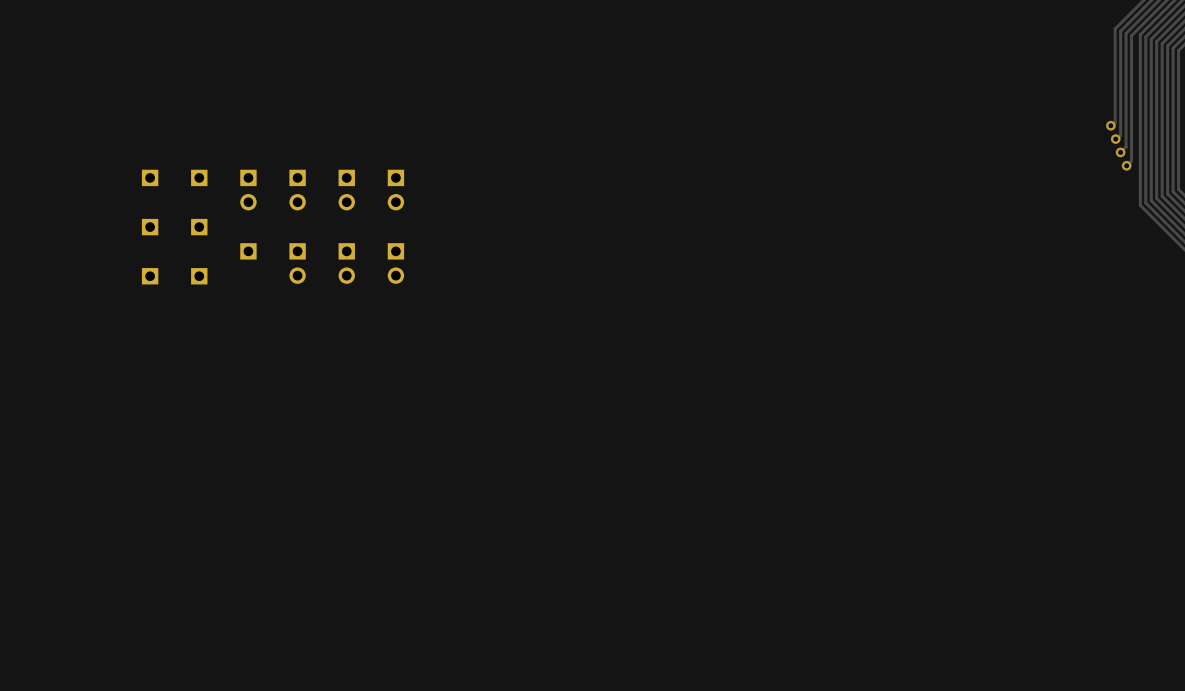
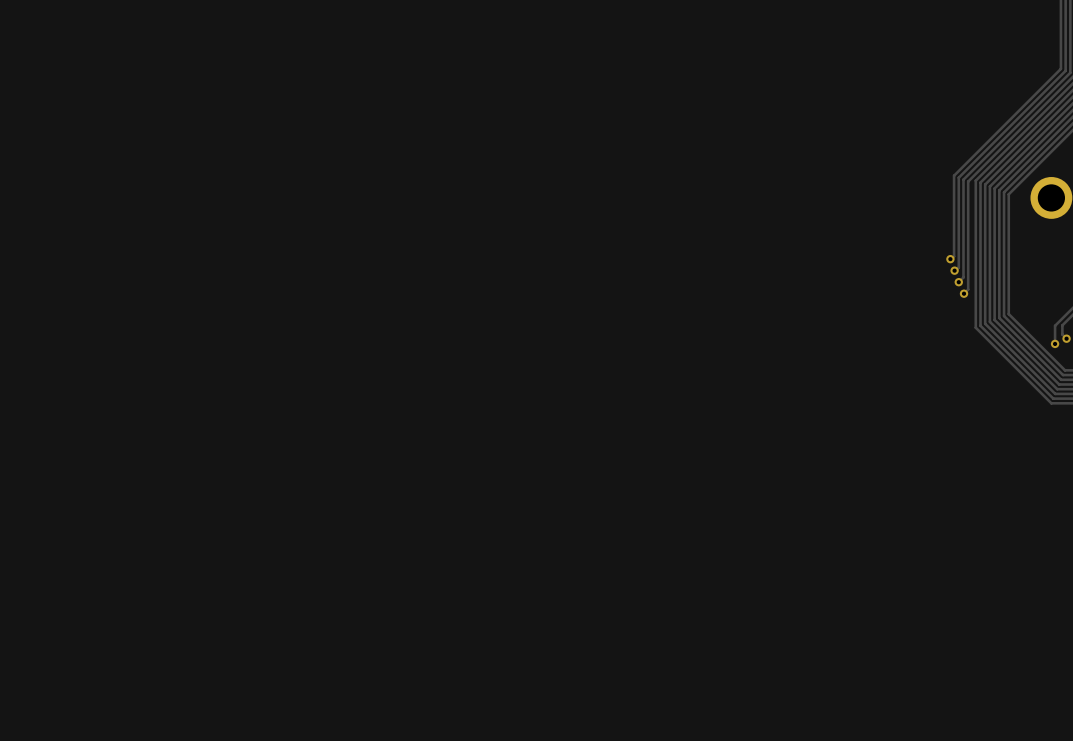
part: (150, 177) -> none
part: (199, 177) -> none
part: (248, 190) -> none
part: (297, 190) -> none
part: (346, 190) -> none
part: (395, 190) -> none
part: (150, 227) -> none
part: (199, 227) -> none
part: (248, 251) -> none
part: (297, 263) -> none
part: (346, 263) -> none
part: (395, 263) -> none
part: (150, 276) -> none
part: (199, 276) -> none

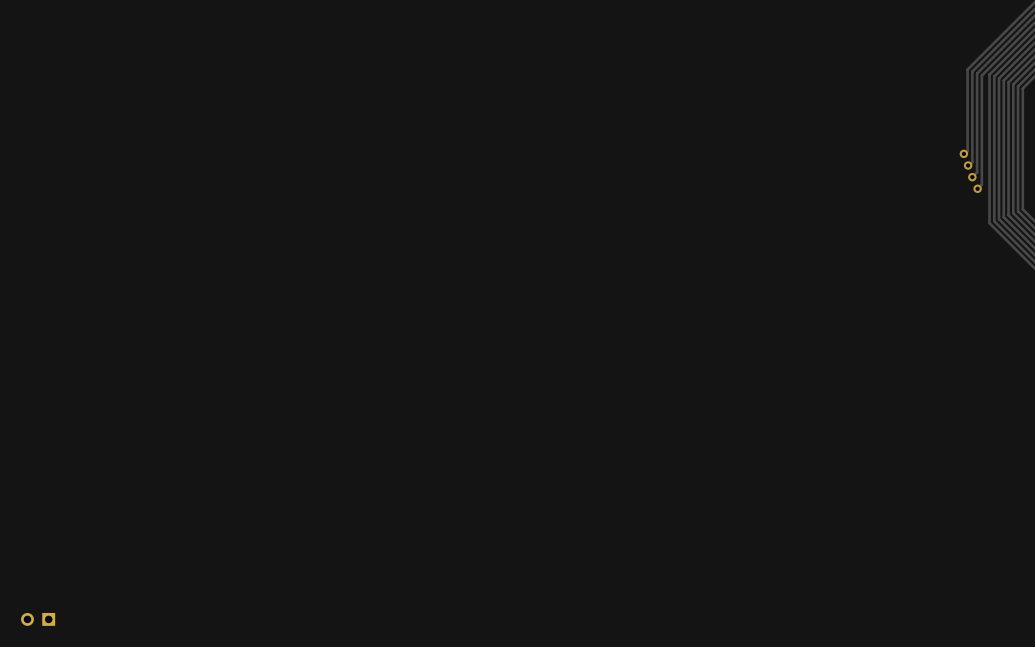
part: none -> (38, 619)

